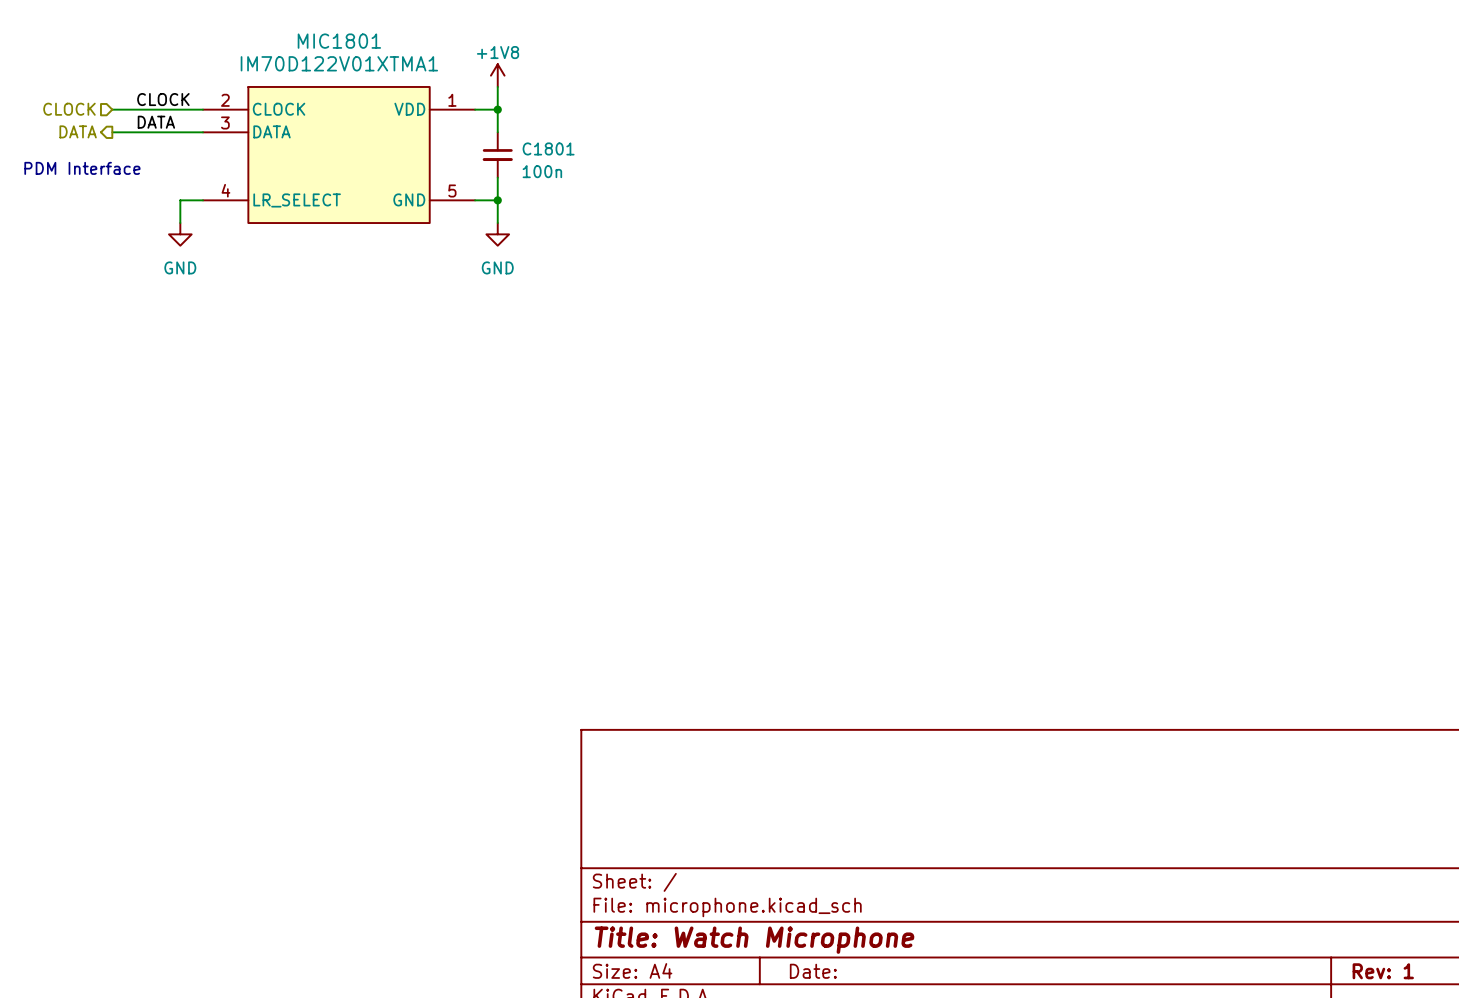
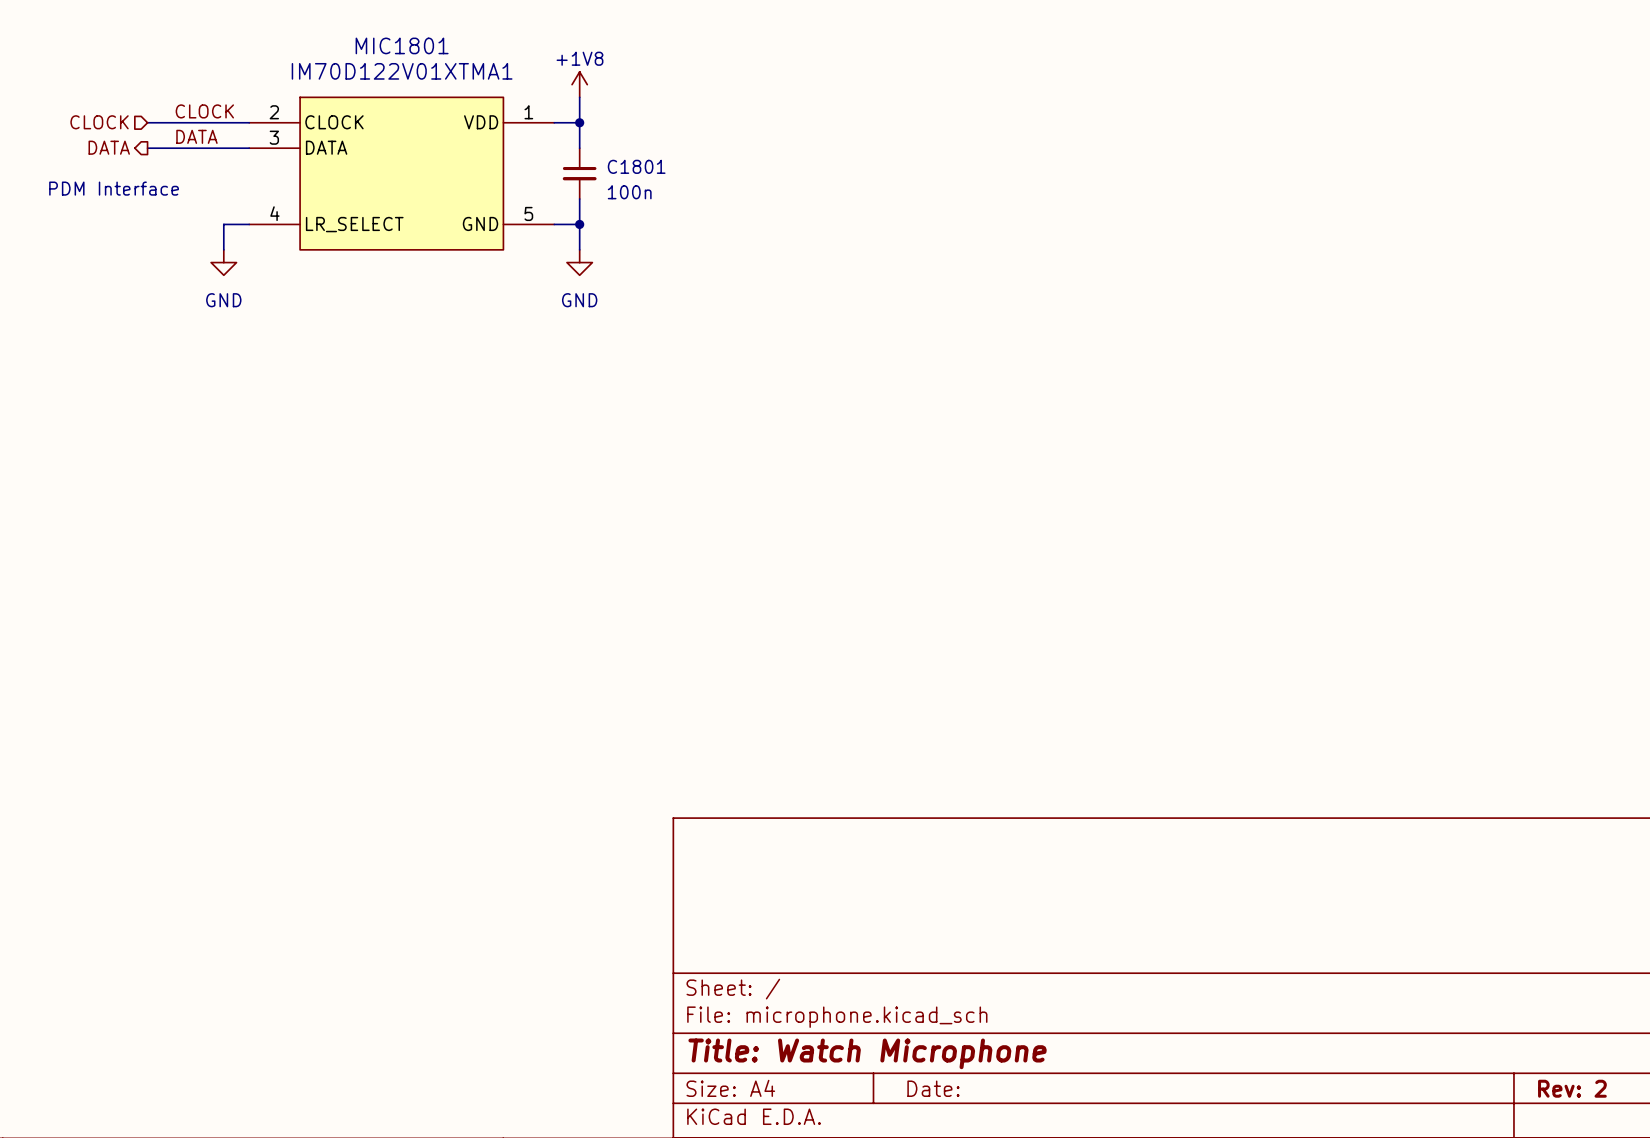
title block: Rev: 1 (1383, 971) -> Rev: 2 (1572, 1088)

